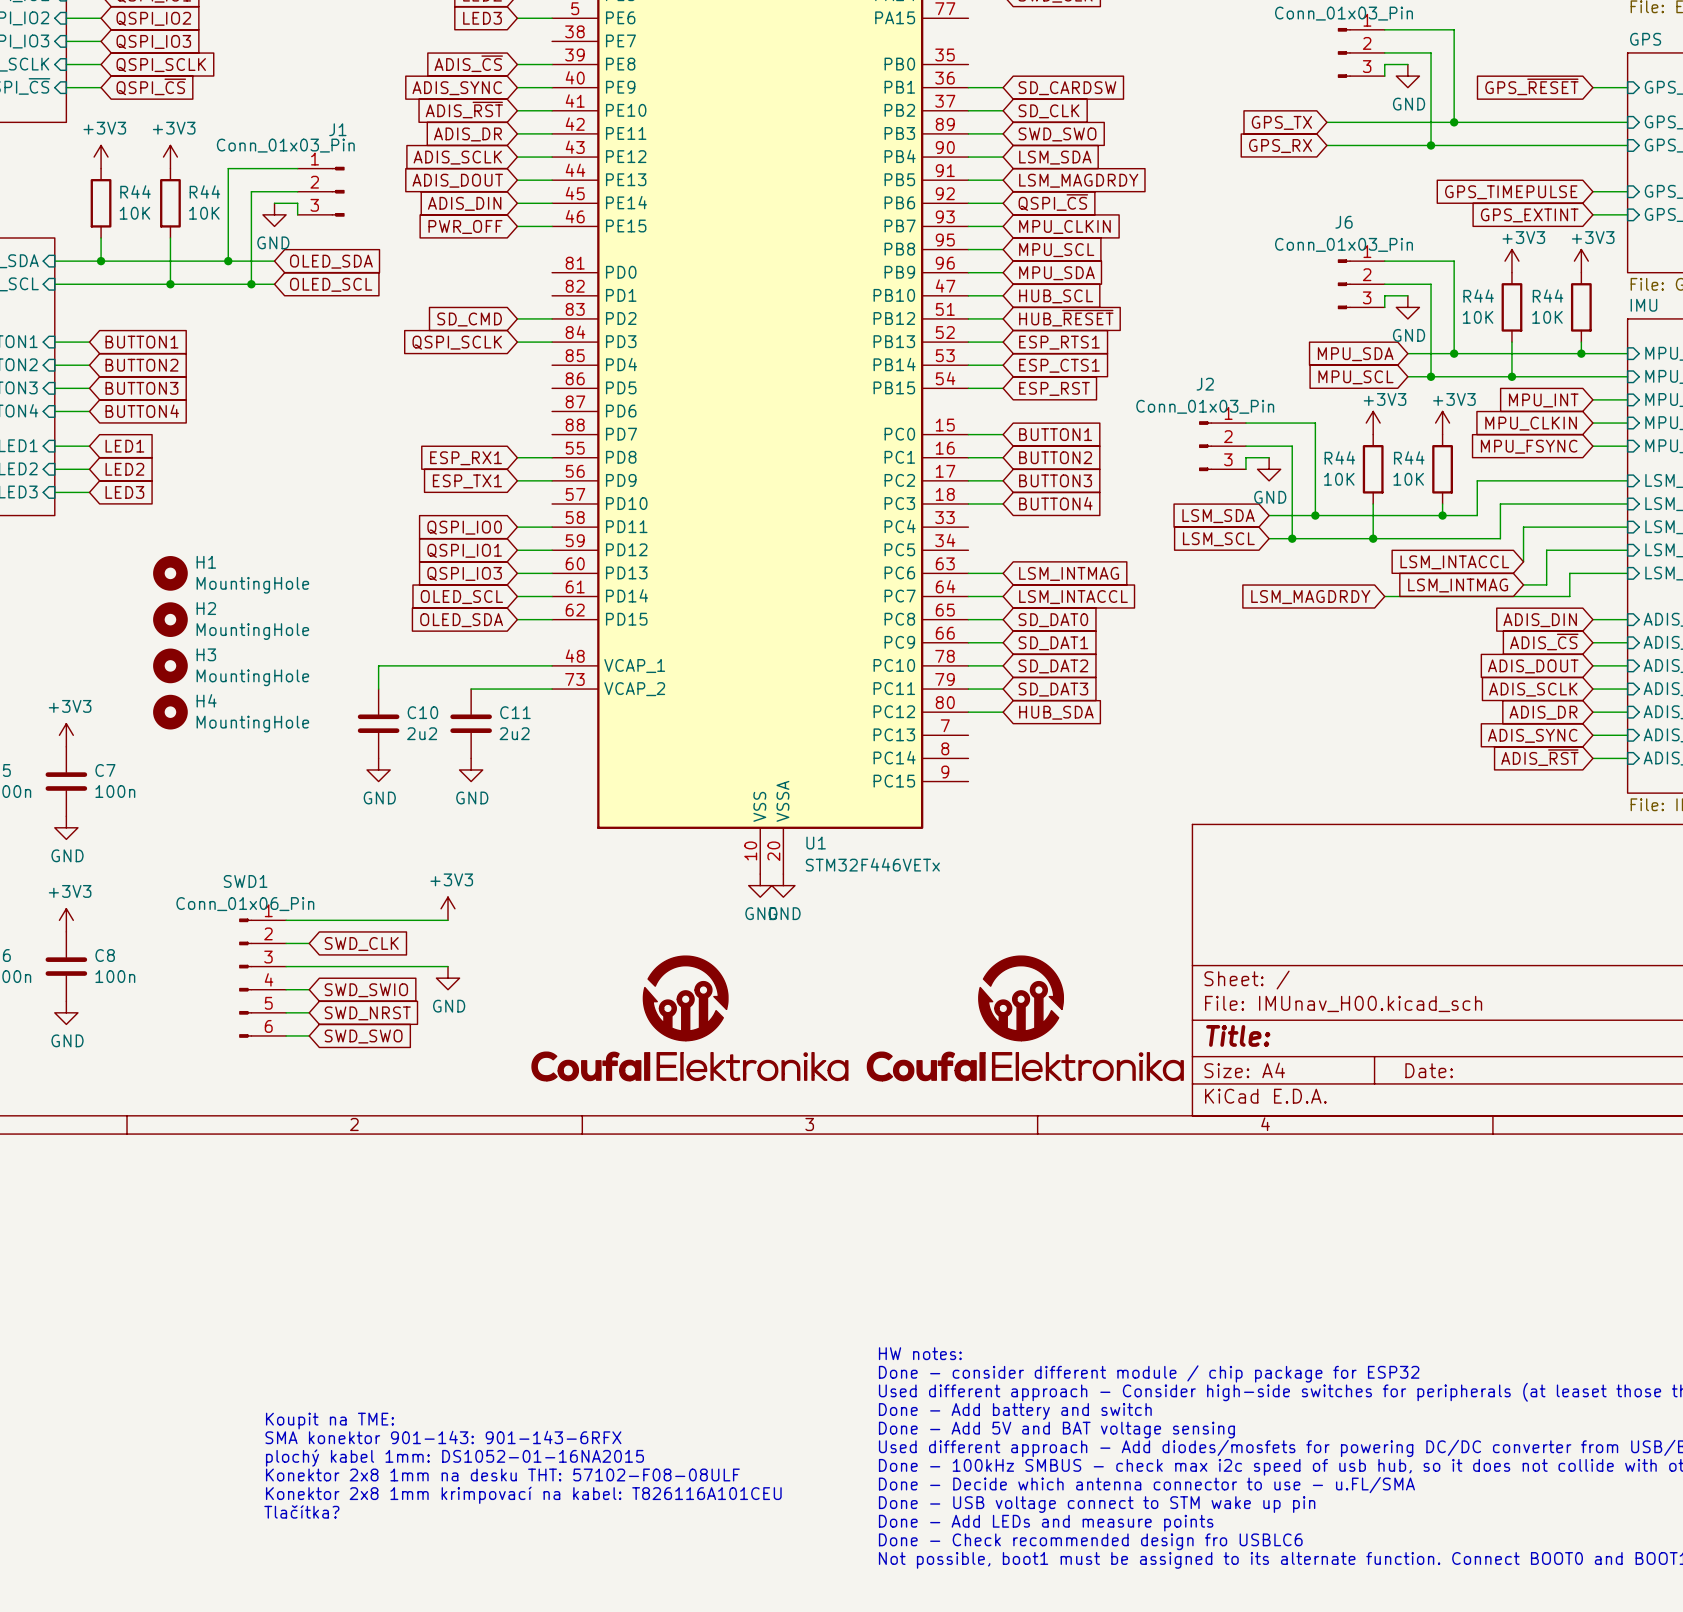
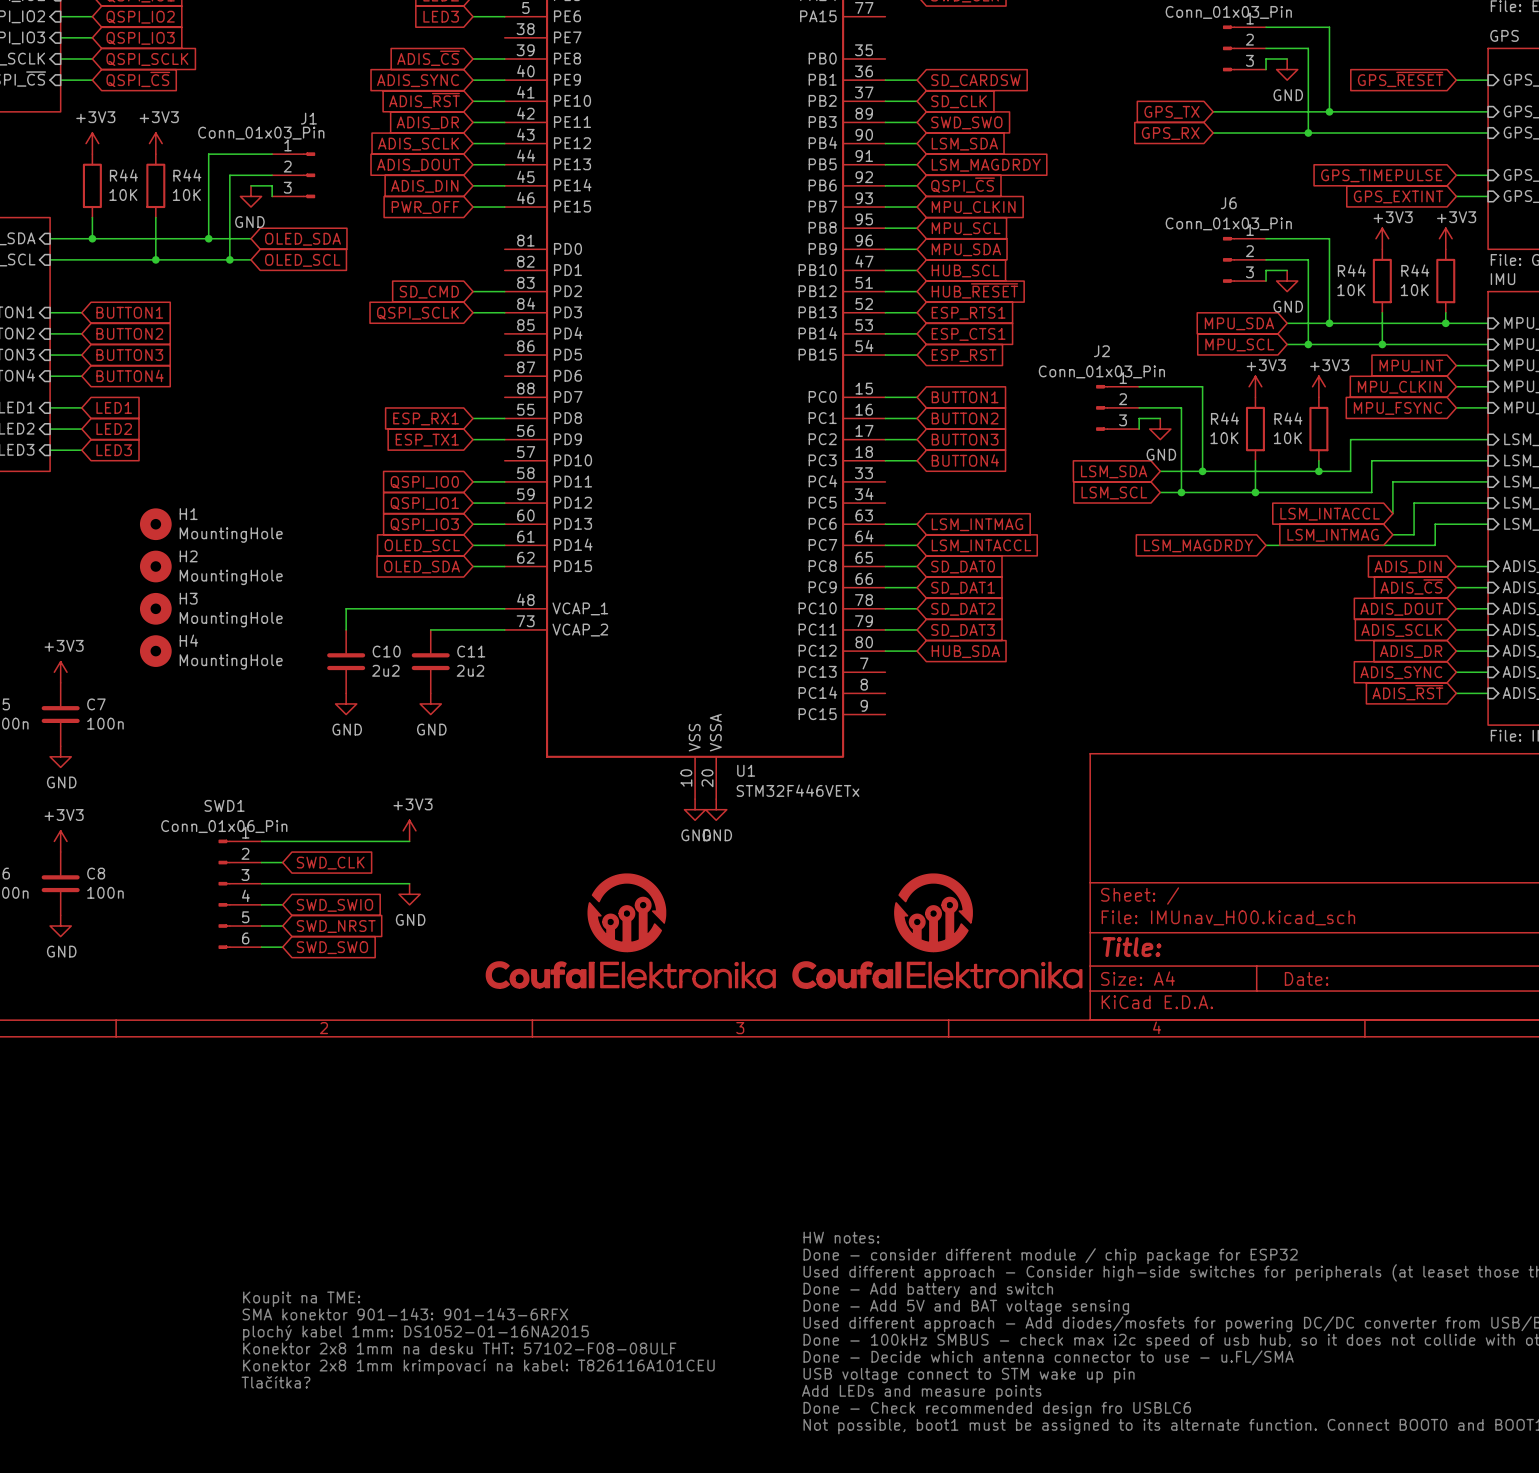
text: Done - USB voltage connect to STM wake up pin (1097, 1504) -> USB voltage connect to STM wake up pin (969, 1375)
text: Done - Add LEDs and measure points (1046, 1523) -> Add LEDs and measure points (921, 1392)

